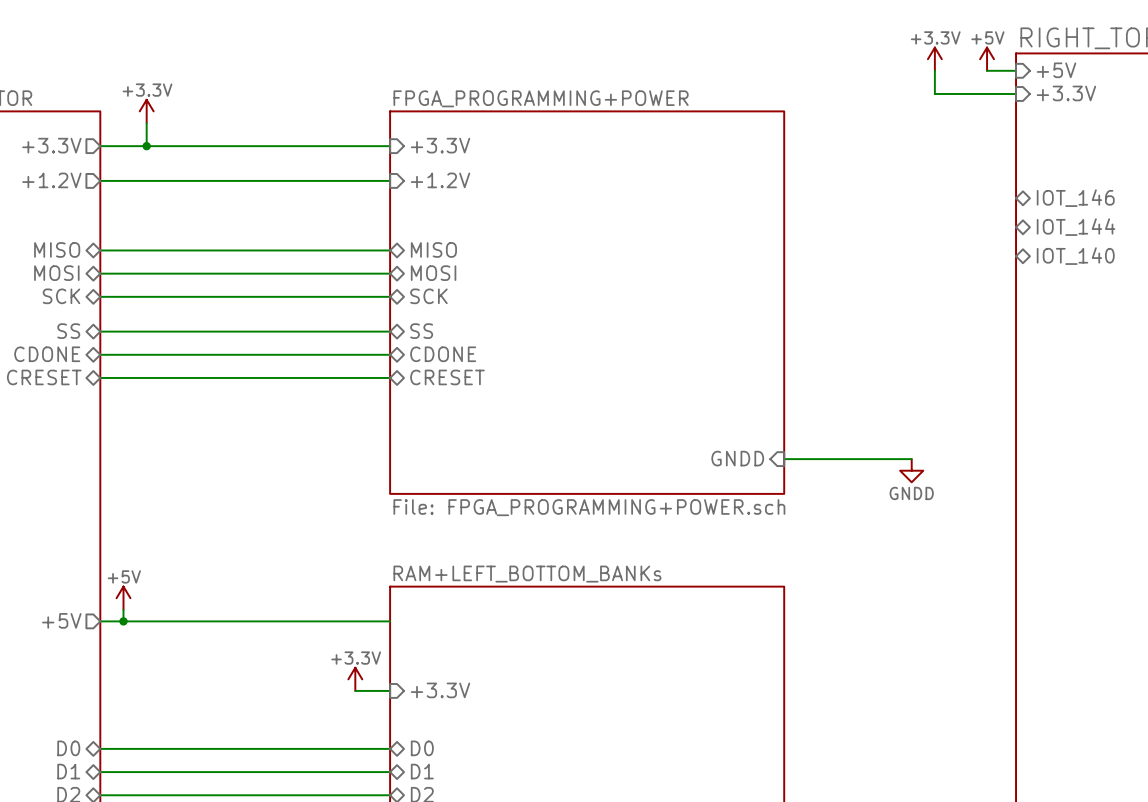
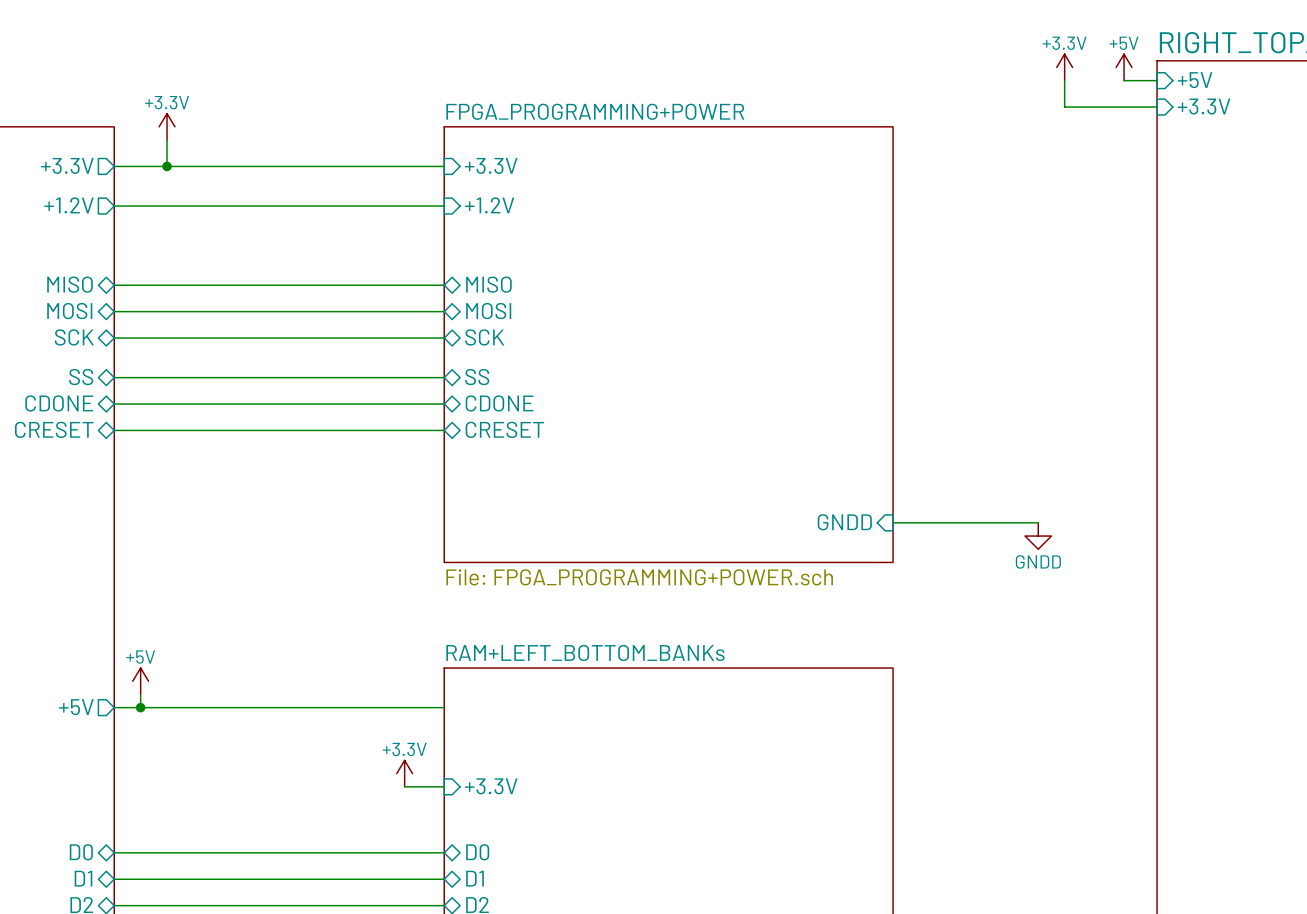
sheet pin: IOT_146 (1075, 198) -> none
sheet pin: IOT_144 (1076, 227) -> none
sheet pin: IOT_140 (1075, 256) -> none

